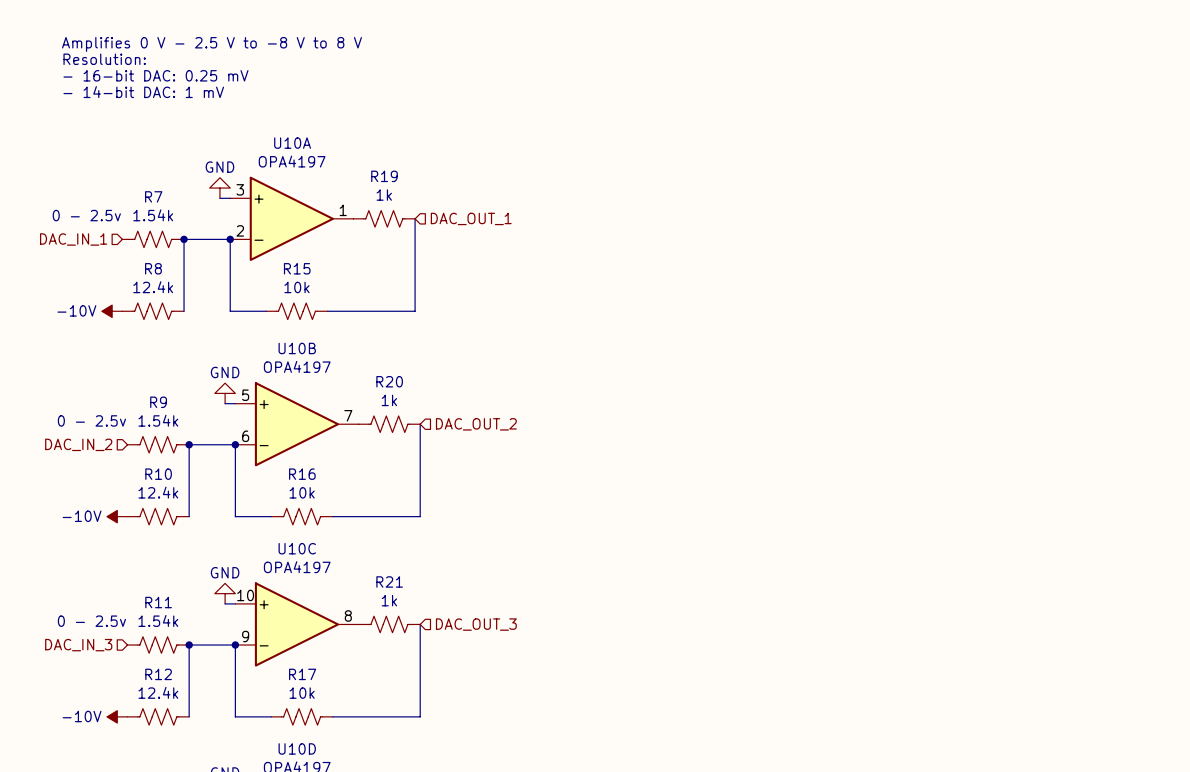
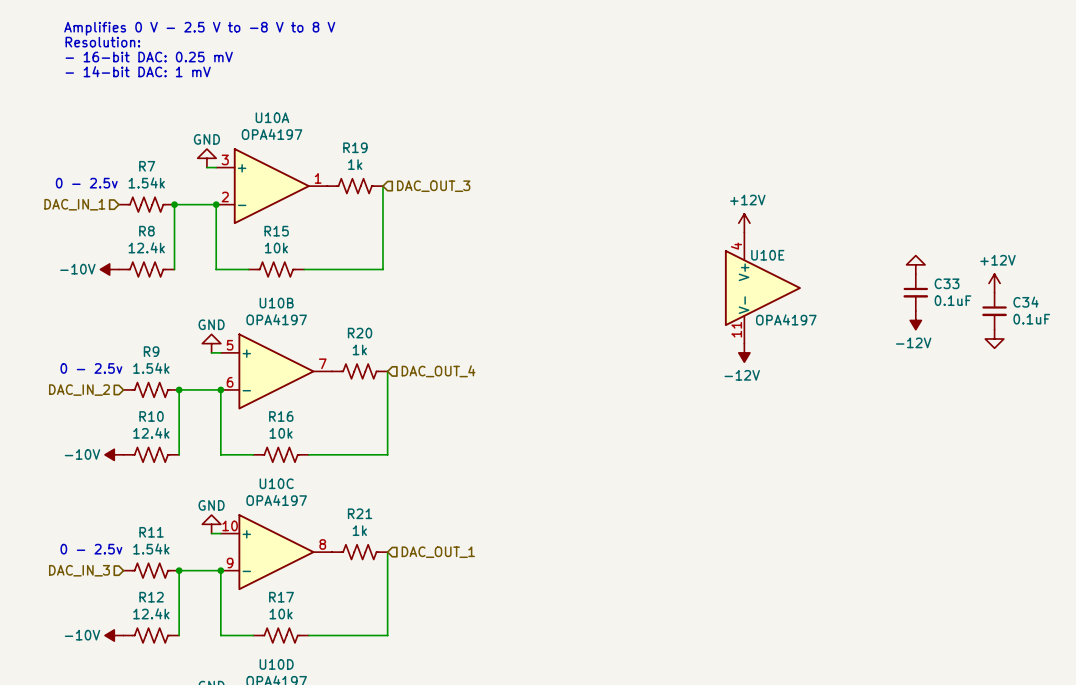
hierarchical label: DAC_OUT_1 (471, 218) -> DAC_OUT_3 (433, 186)
power symbol: none -> +12V (744, 223)
power symbol: none -> (915, 264)
power symbol: none -> +12V (994, 283)
U10E: none -> OPA4197 (762, 288)
C33: none -> 0.1uF (915, 292)
C34: none -> 0.1uF (994, 311)
power symbol: none -> -12V (915, 320)
power symbol: none -> (994, 338)
power symbol: none -> -12V (744, 352)
hierarchical label: DAC_OUT_2 (476, 424) -> DAC_OUT_4 (438, 371)
hierarchical label: DAC_OUT_3 (476, 624) -> DAC_OUT_1 (438, 552)

